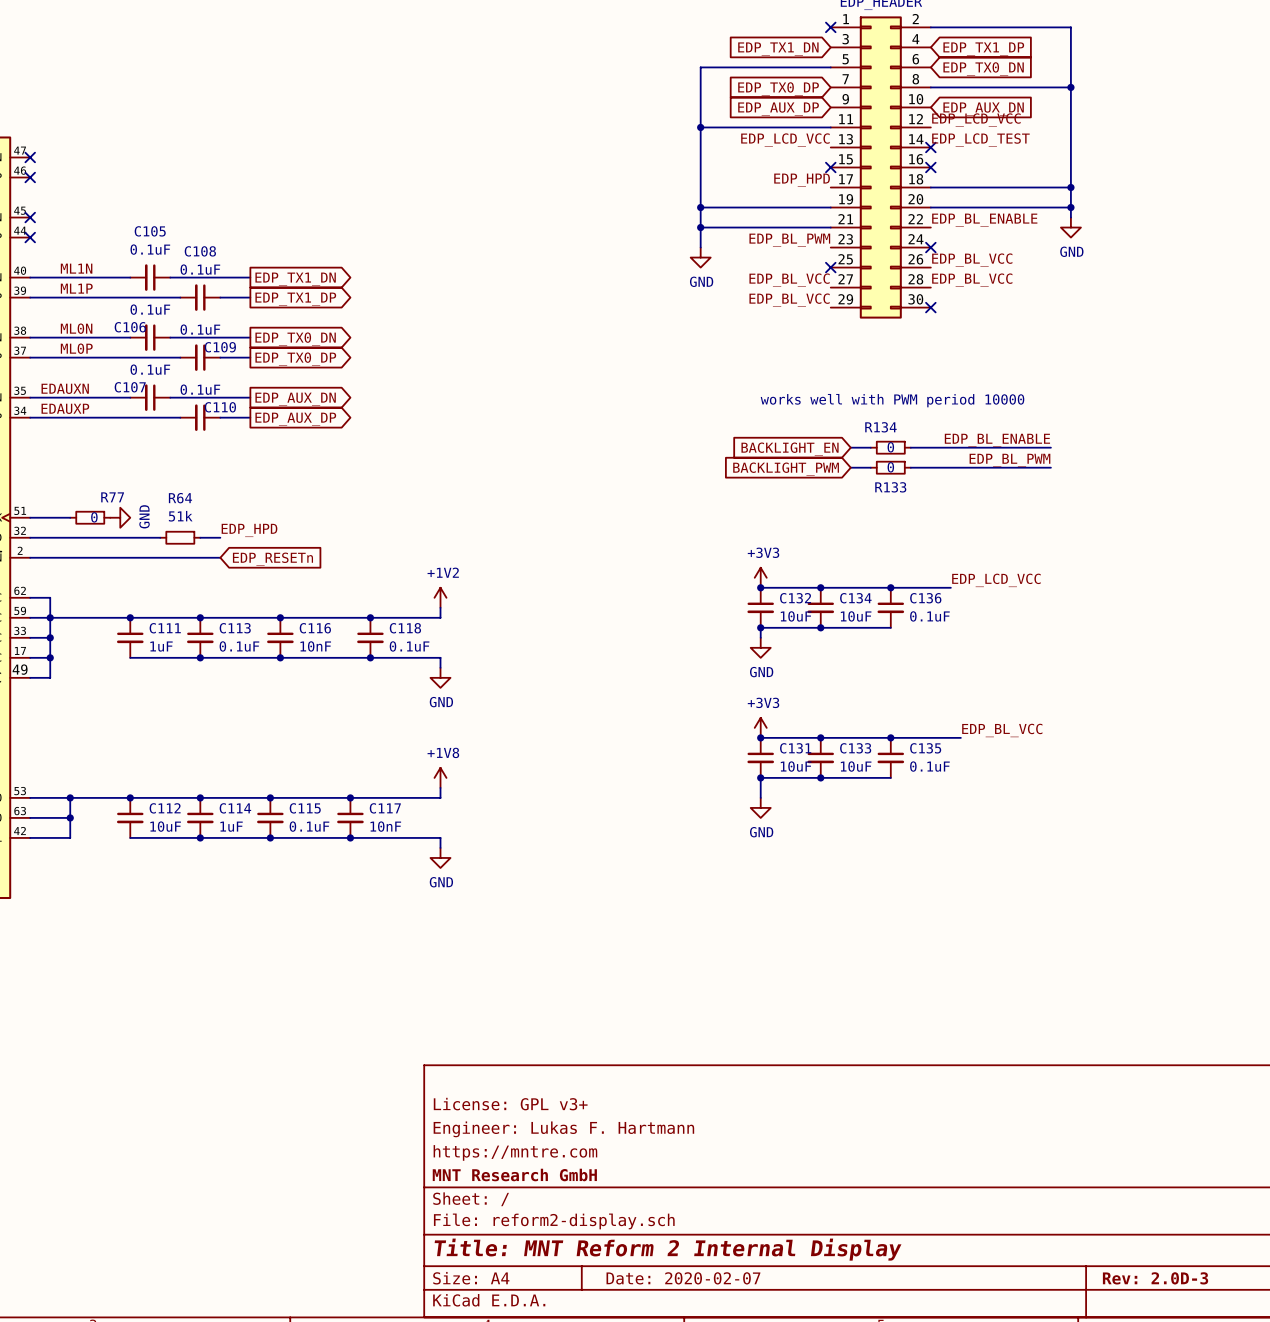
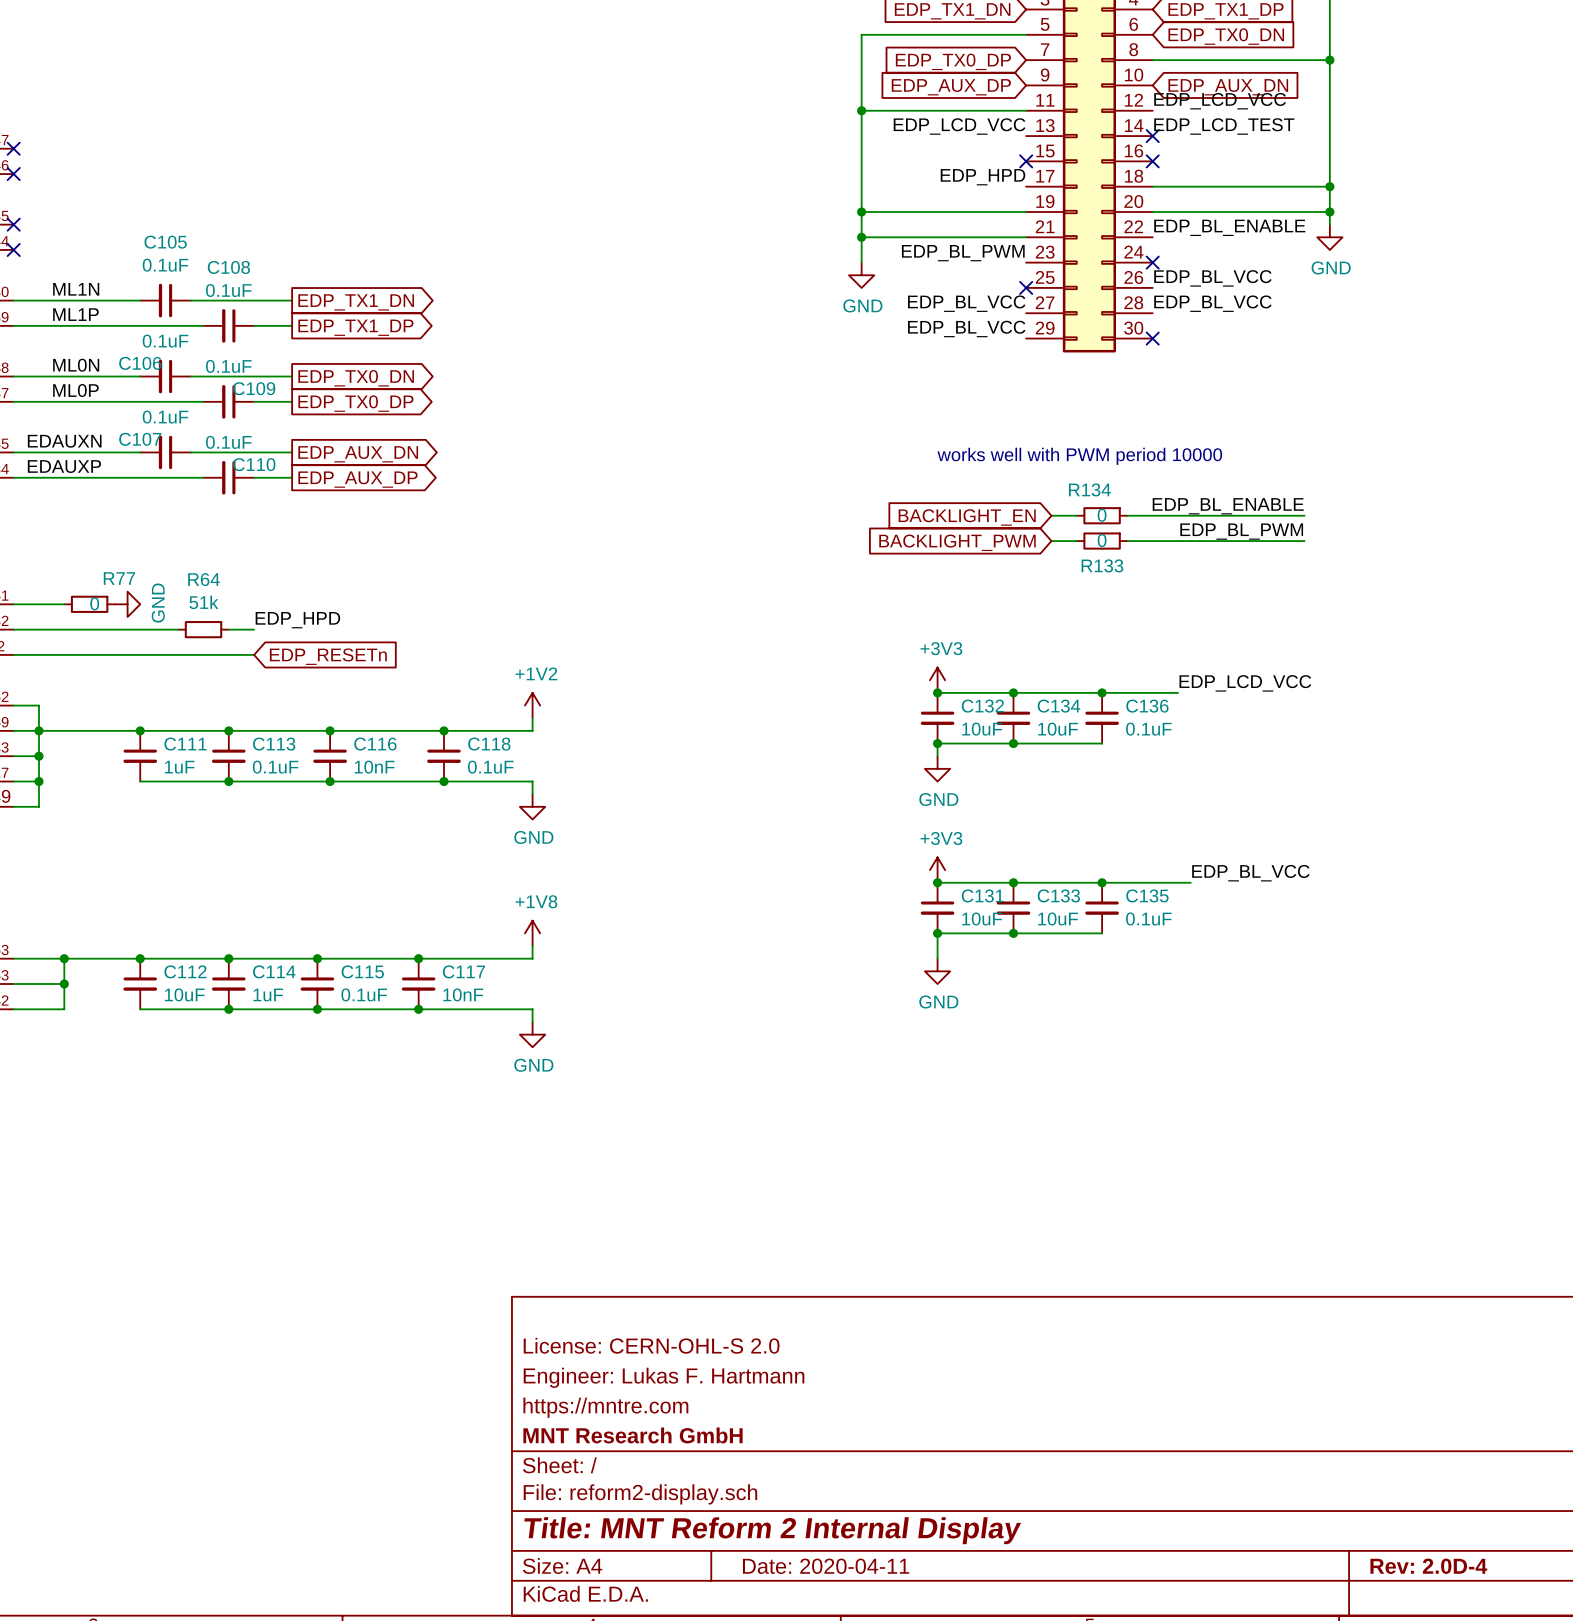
title block: License: GPL v3+ (510, 1104) -> License: CERN-OHL-S 2.0 (651, 1345)
title block: Date: 2020-02-07 (683, 1278) -> Date: 2020-04-11 (826, 1566)
title block: Rev: 2.0D-3 (1155, 1278) -> Rev: 2.0D-4 (1428, 1566)

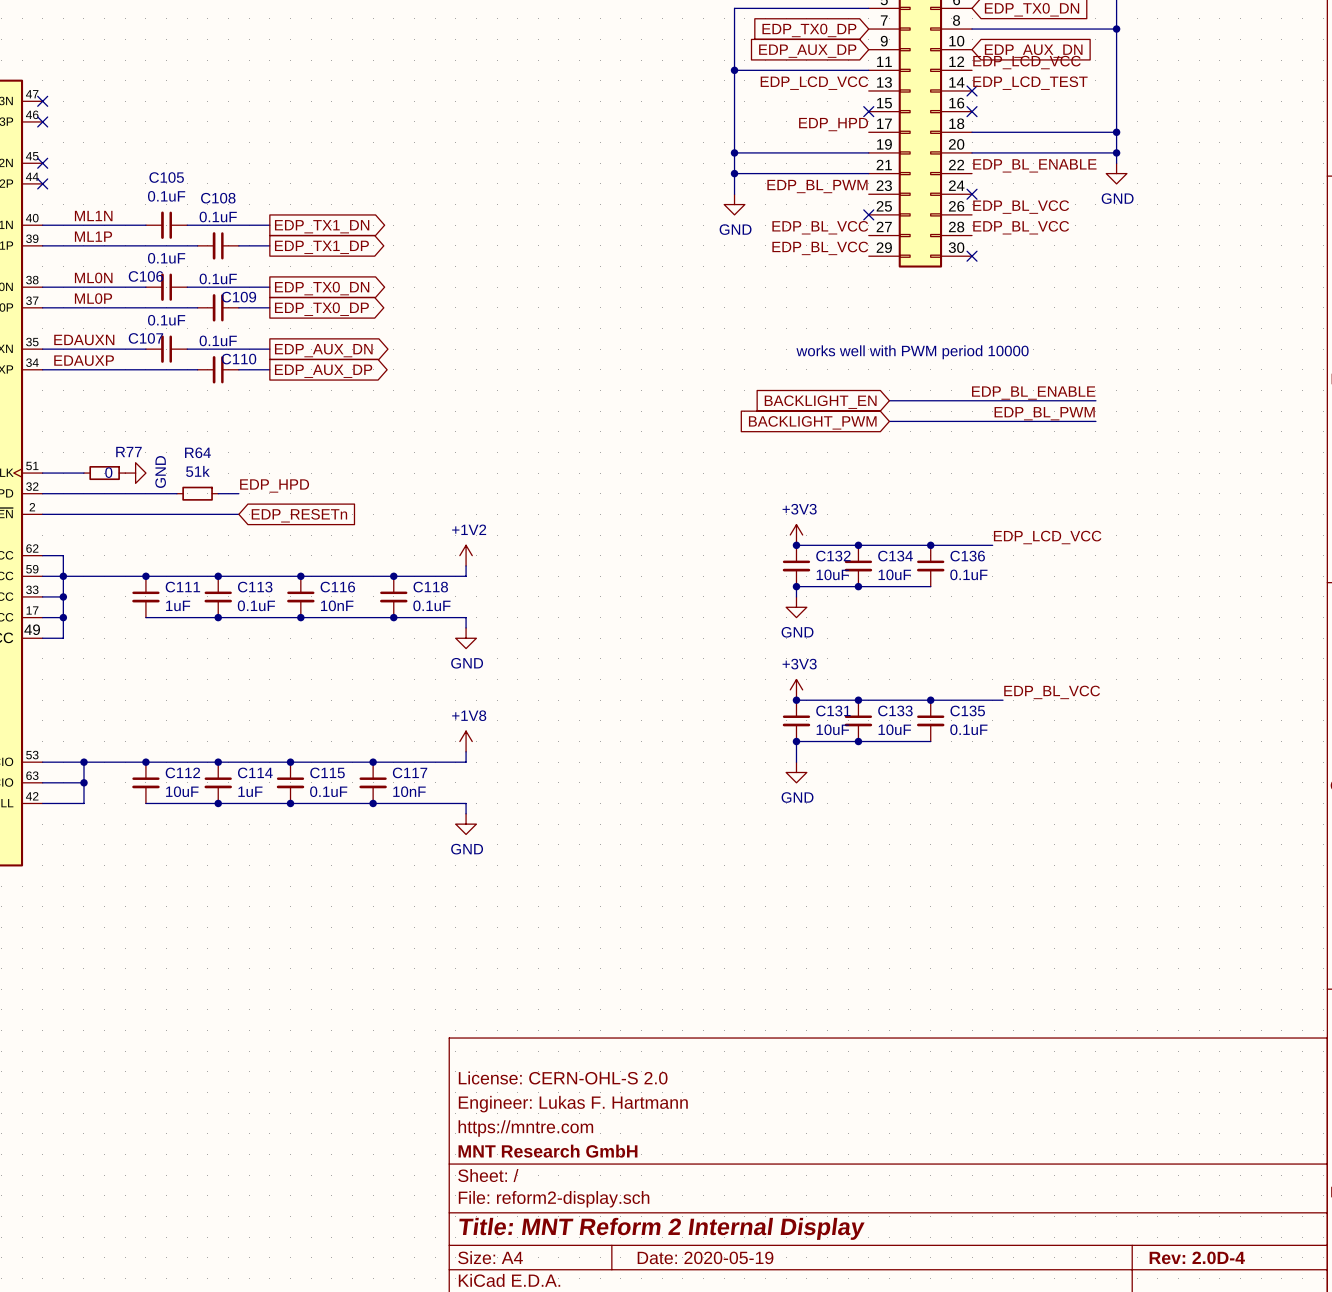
wire: none -> (910, 400) (951, 400)
R134: 0 (1102, 515) -> none
wire: none -> (910, 421) (951, 421)
R133: 0 (1102, 541) -> none
title block: Date: 2020-04-11 (826, 1566) -> Date: 2020-05-19 (705, 1257)

